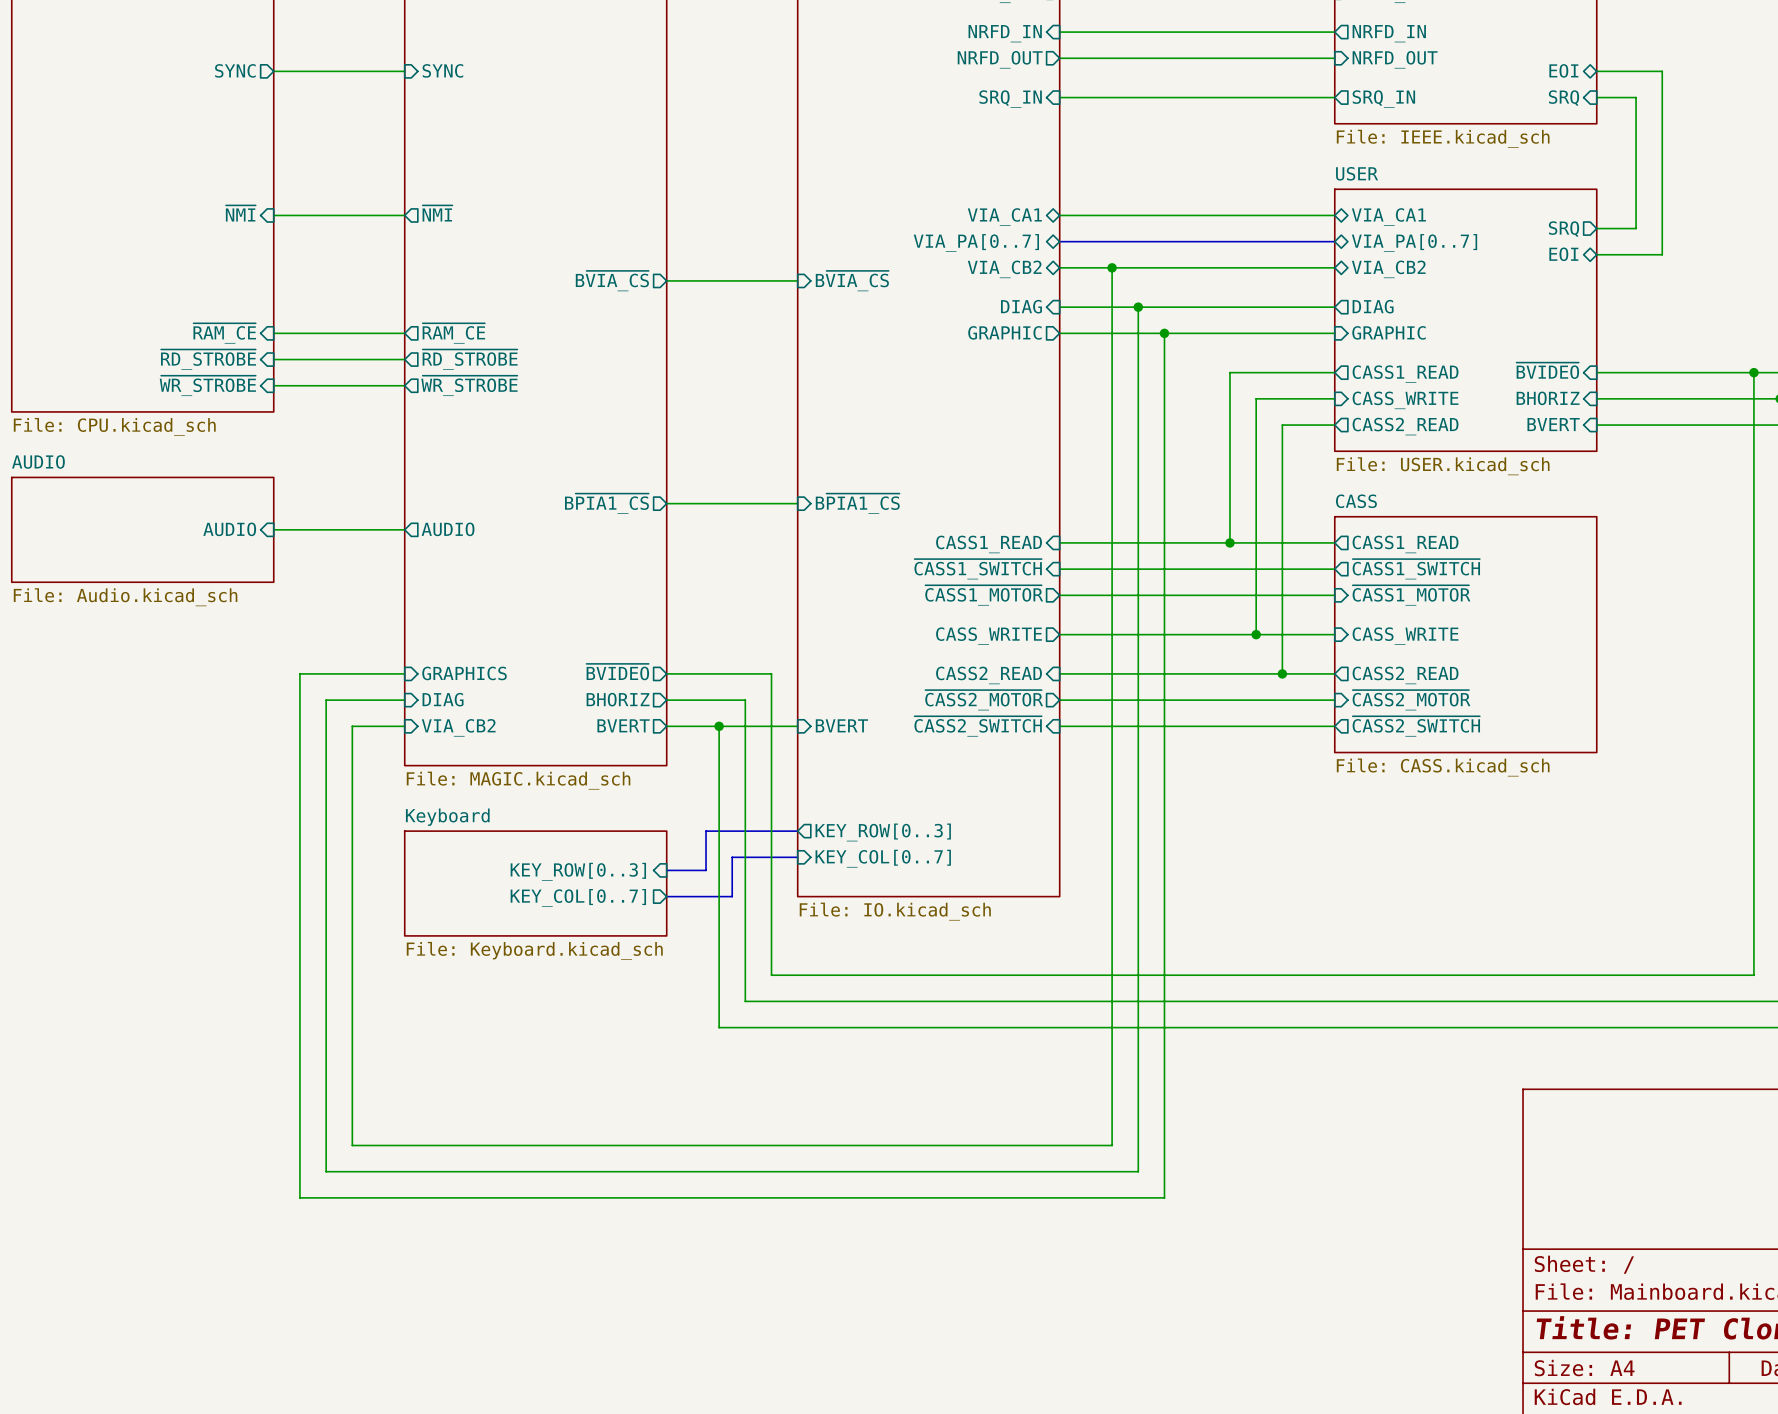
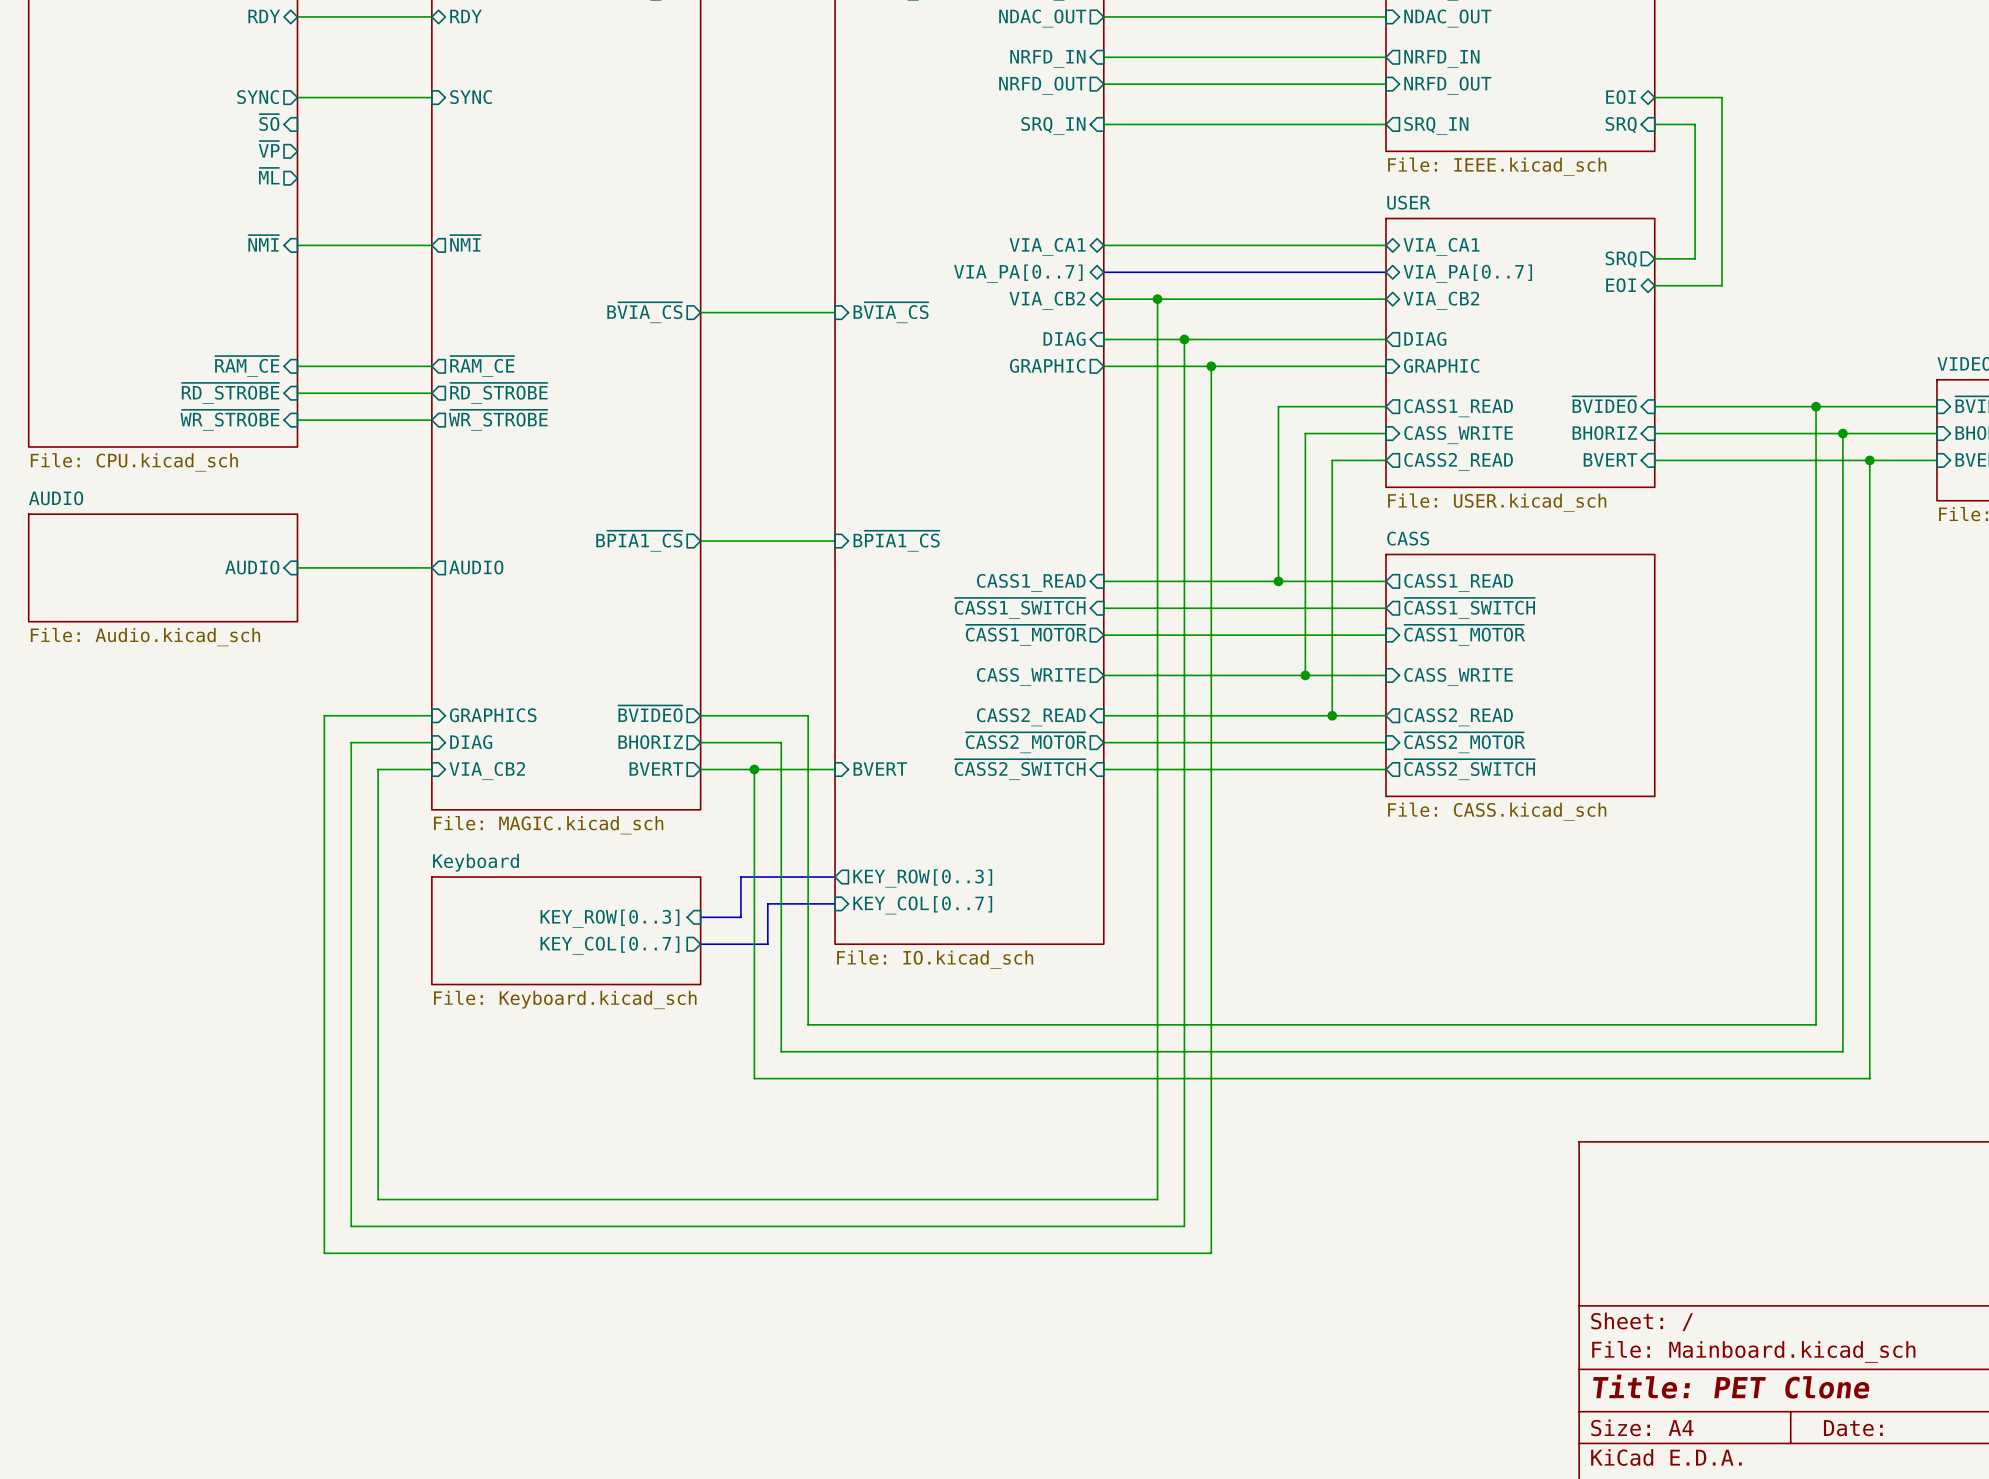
sheet pin: none -> ~{SO} (269, 122)
sheet pin: none -> ~{VP} (269, 149)
sheet pin: none -> ~{ML} (269, 176)

